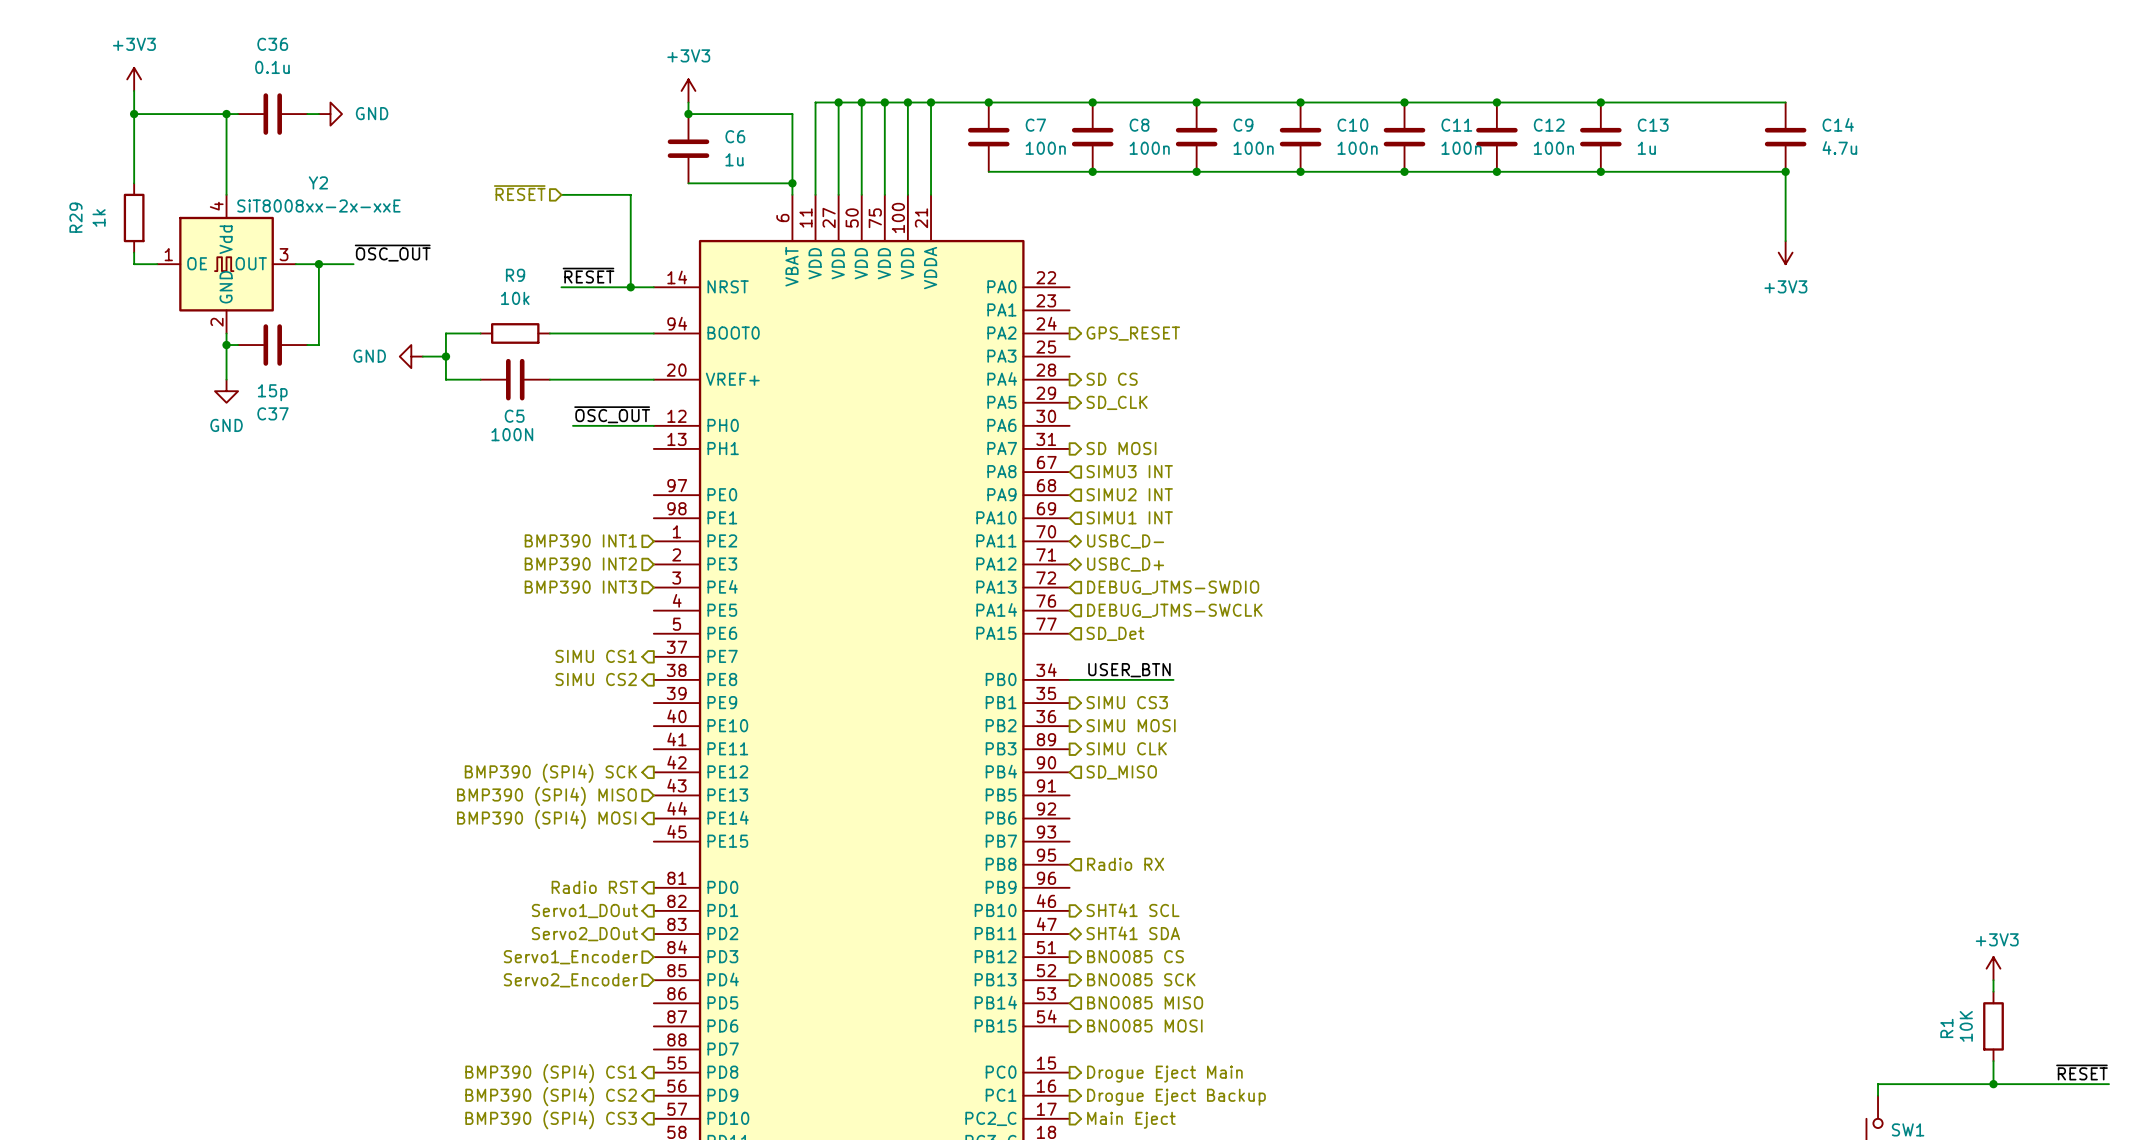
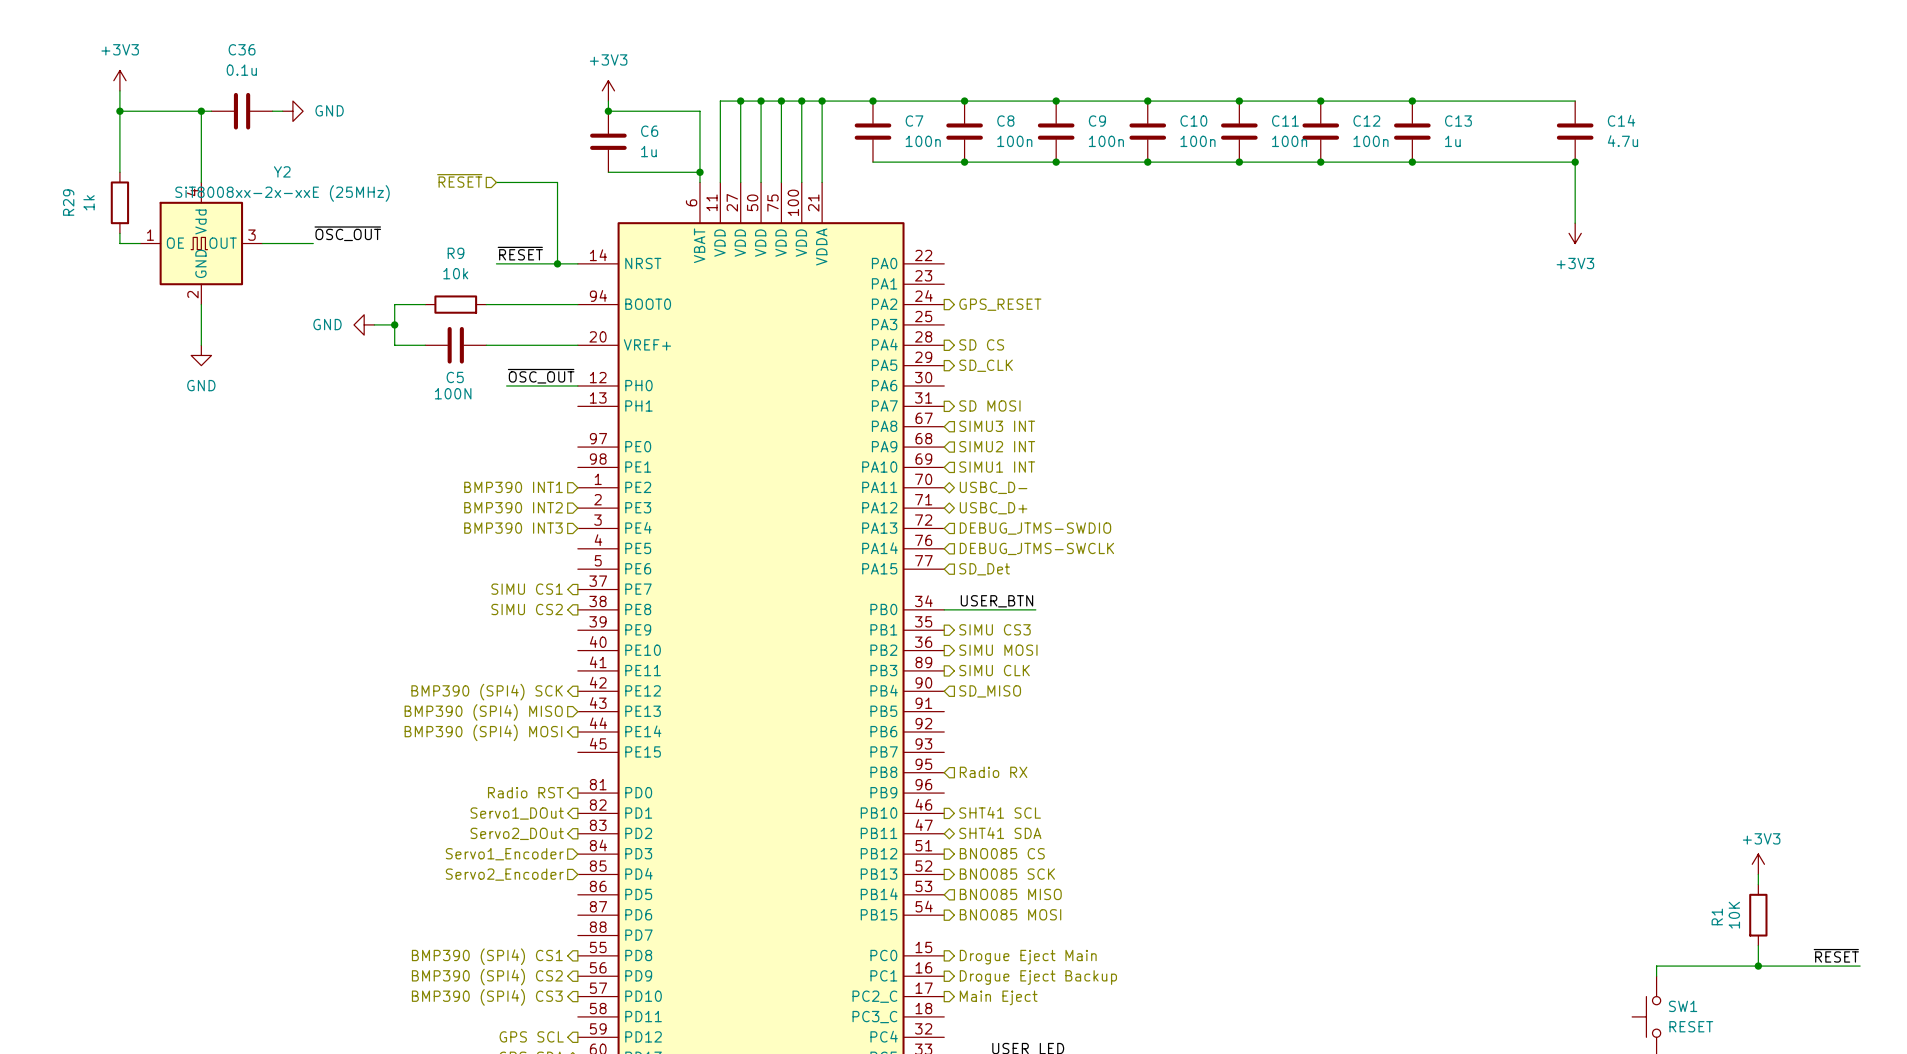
Y2 value: SiT8008xx-2x-xxE (318, 206) -> SiT8008xx-2x-xxE (25MHz) (282, 193)
wire: (318, 264) (318, 345) (307, 345) -> none
junction: (318, 264) -> none
wire: (226, 345) (238, 345) -> none
junction: (226, 345) -> none
C37: 15p (272, 345) -> none

